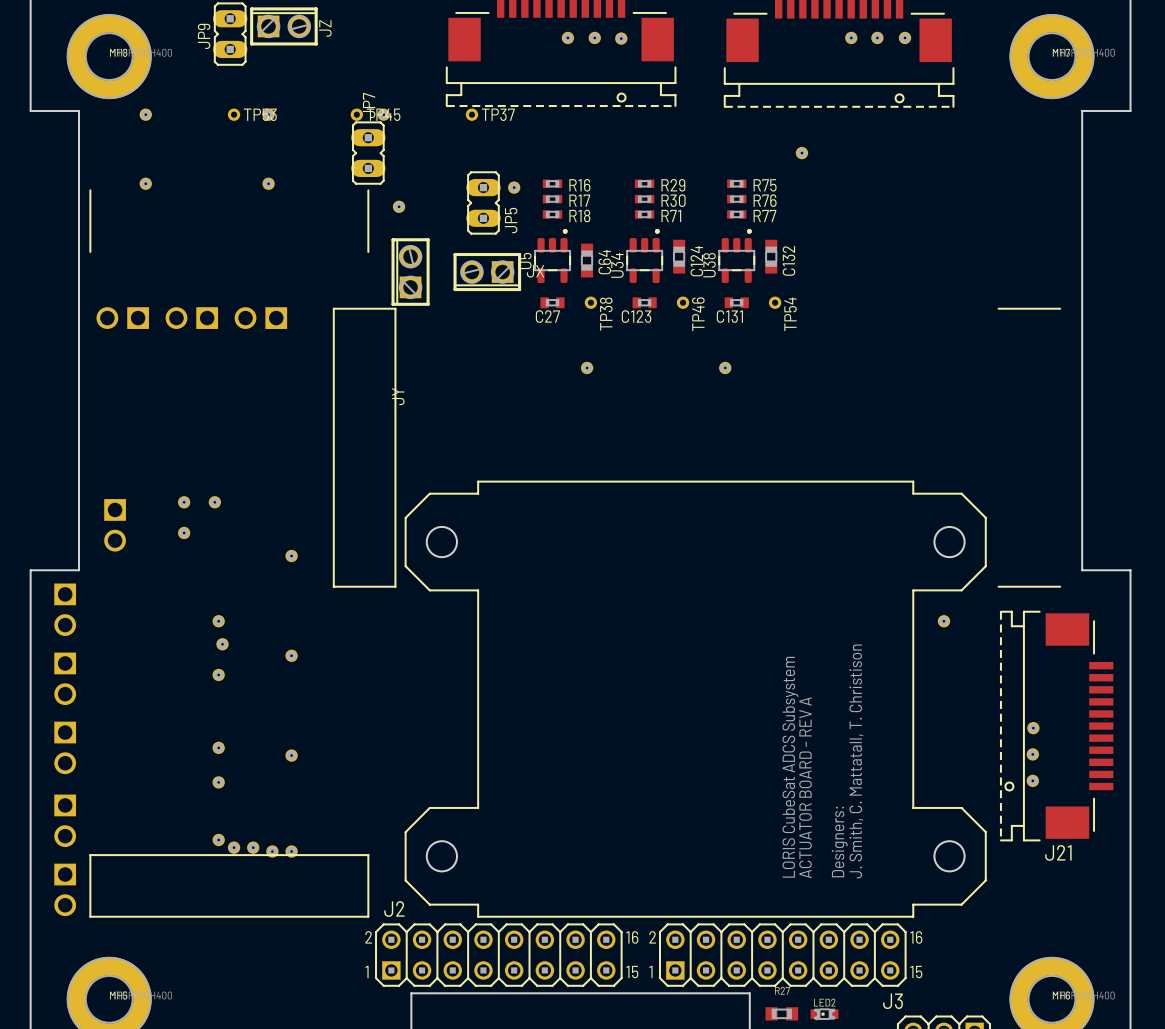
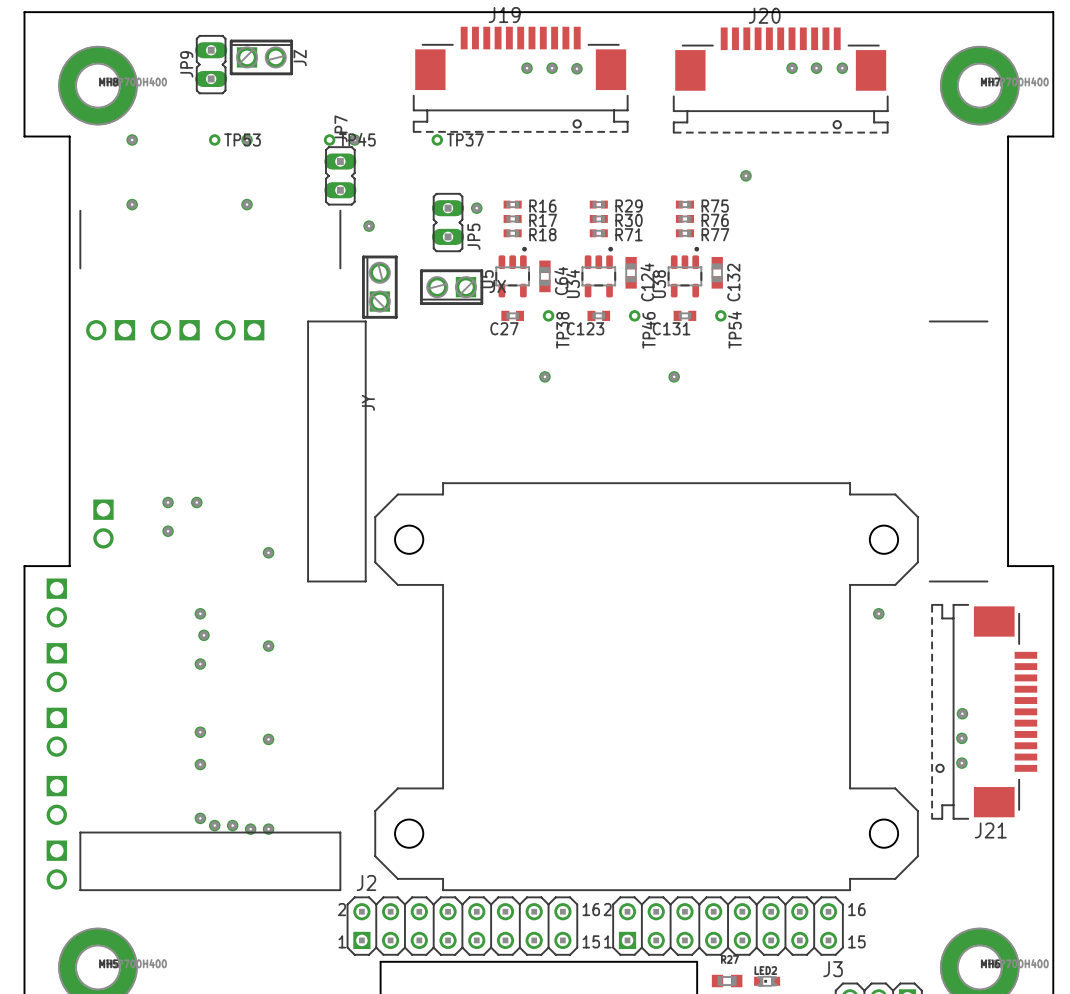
text: J. Smith, C. Mattatall, T. Christison (856, 761) -> none
text: LORIS CubeSat ADCS Subsystem (790, 767) -> none
text: ACTUATOR BOARD - REV A (805, 787) -> none
text: Designers: (839, 842) -> none

